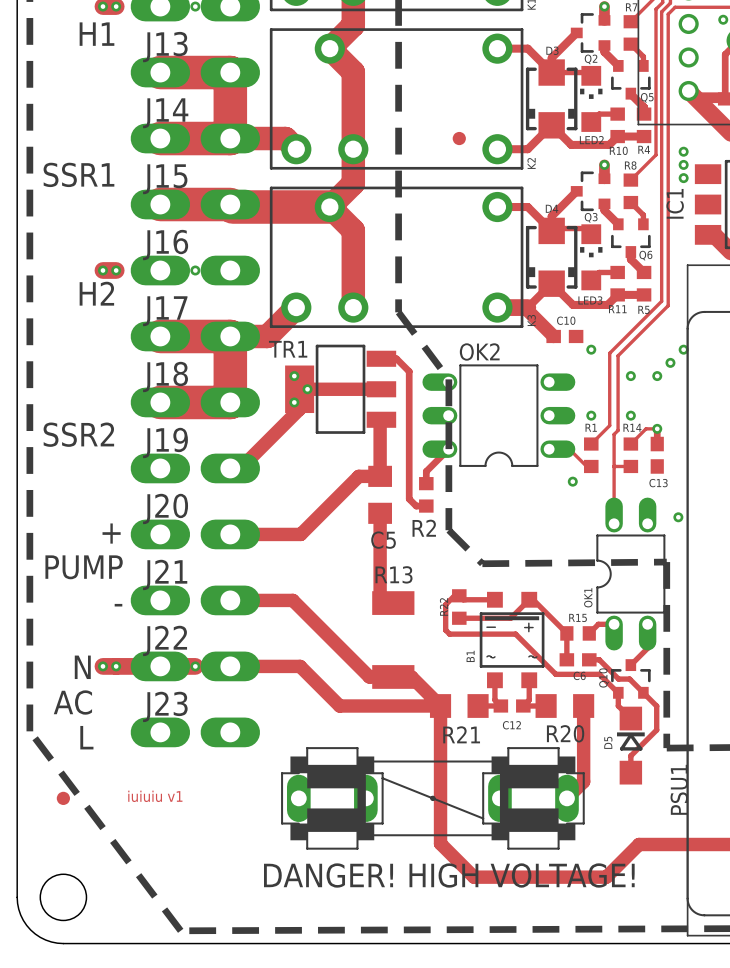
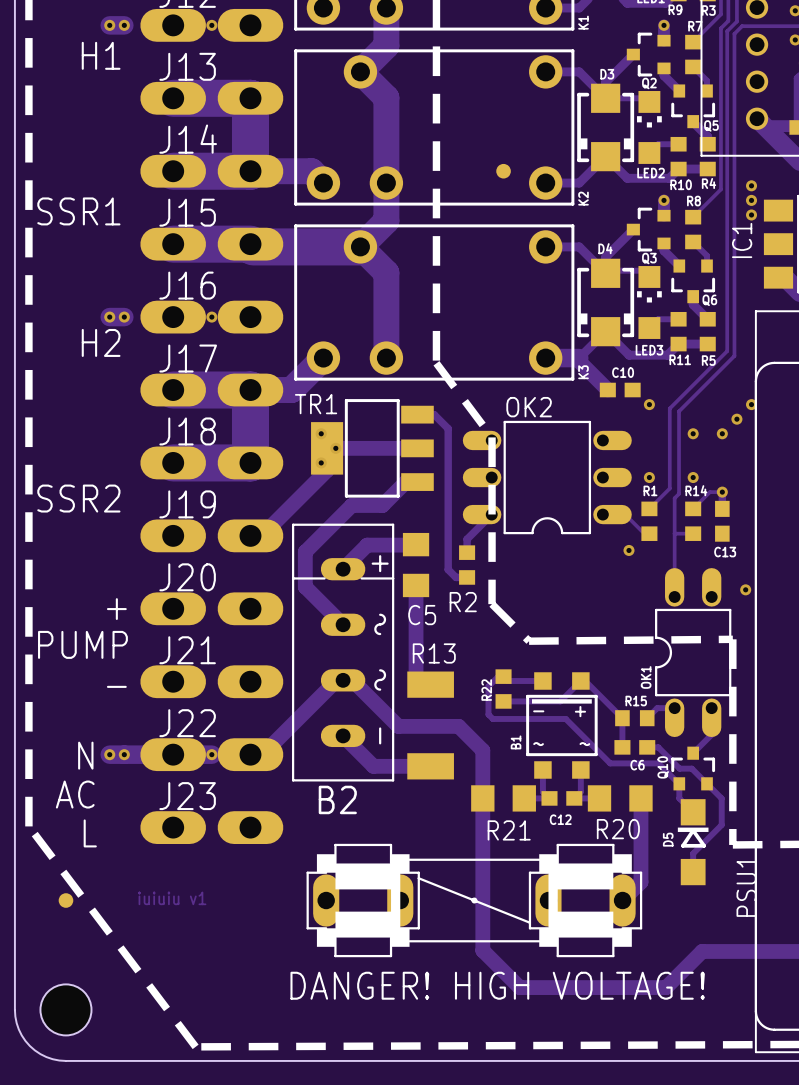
track: (381, 419) (380, 476) (358, 476) (300, 534) (230, 534) -> (417, 482) (405, 482) (382, 505) (351, 505) (305, 551) (305, 586) (343, 624)
track: none -> (416, 544) (367, 545) (343, 569)
B2: none -> (343, 652)
track: (230, 600) (292, 600) (369, 676) -> (343, 735) (373, 766) (404, 766)
track: (241, 666) (300, 666) (339, 706) (440, 706) (411, 676) (393, 676) -> (262, 754) (336, 680) (352, 680) (398, 726) (458, 726) (482, 750) (482, 798)

